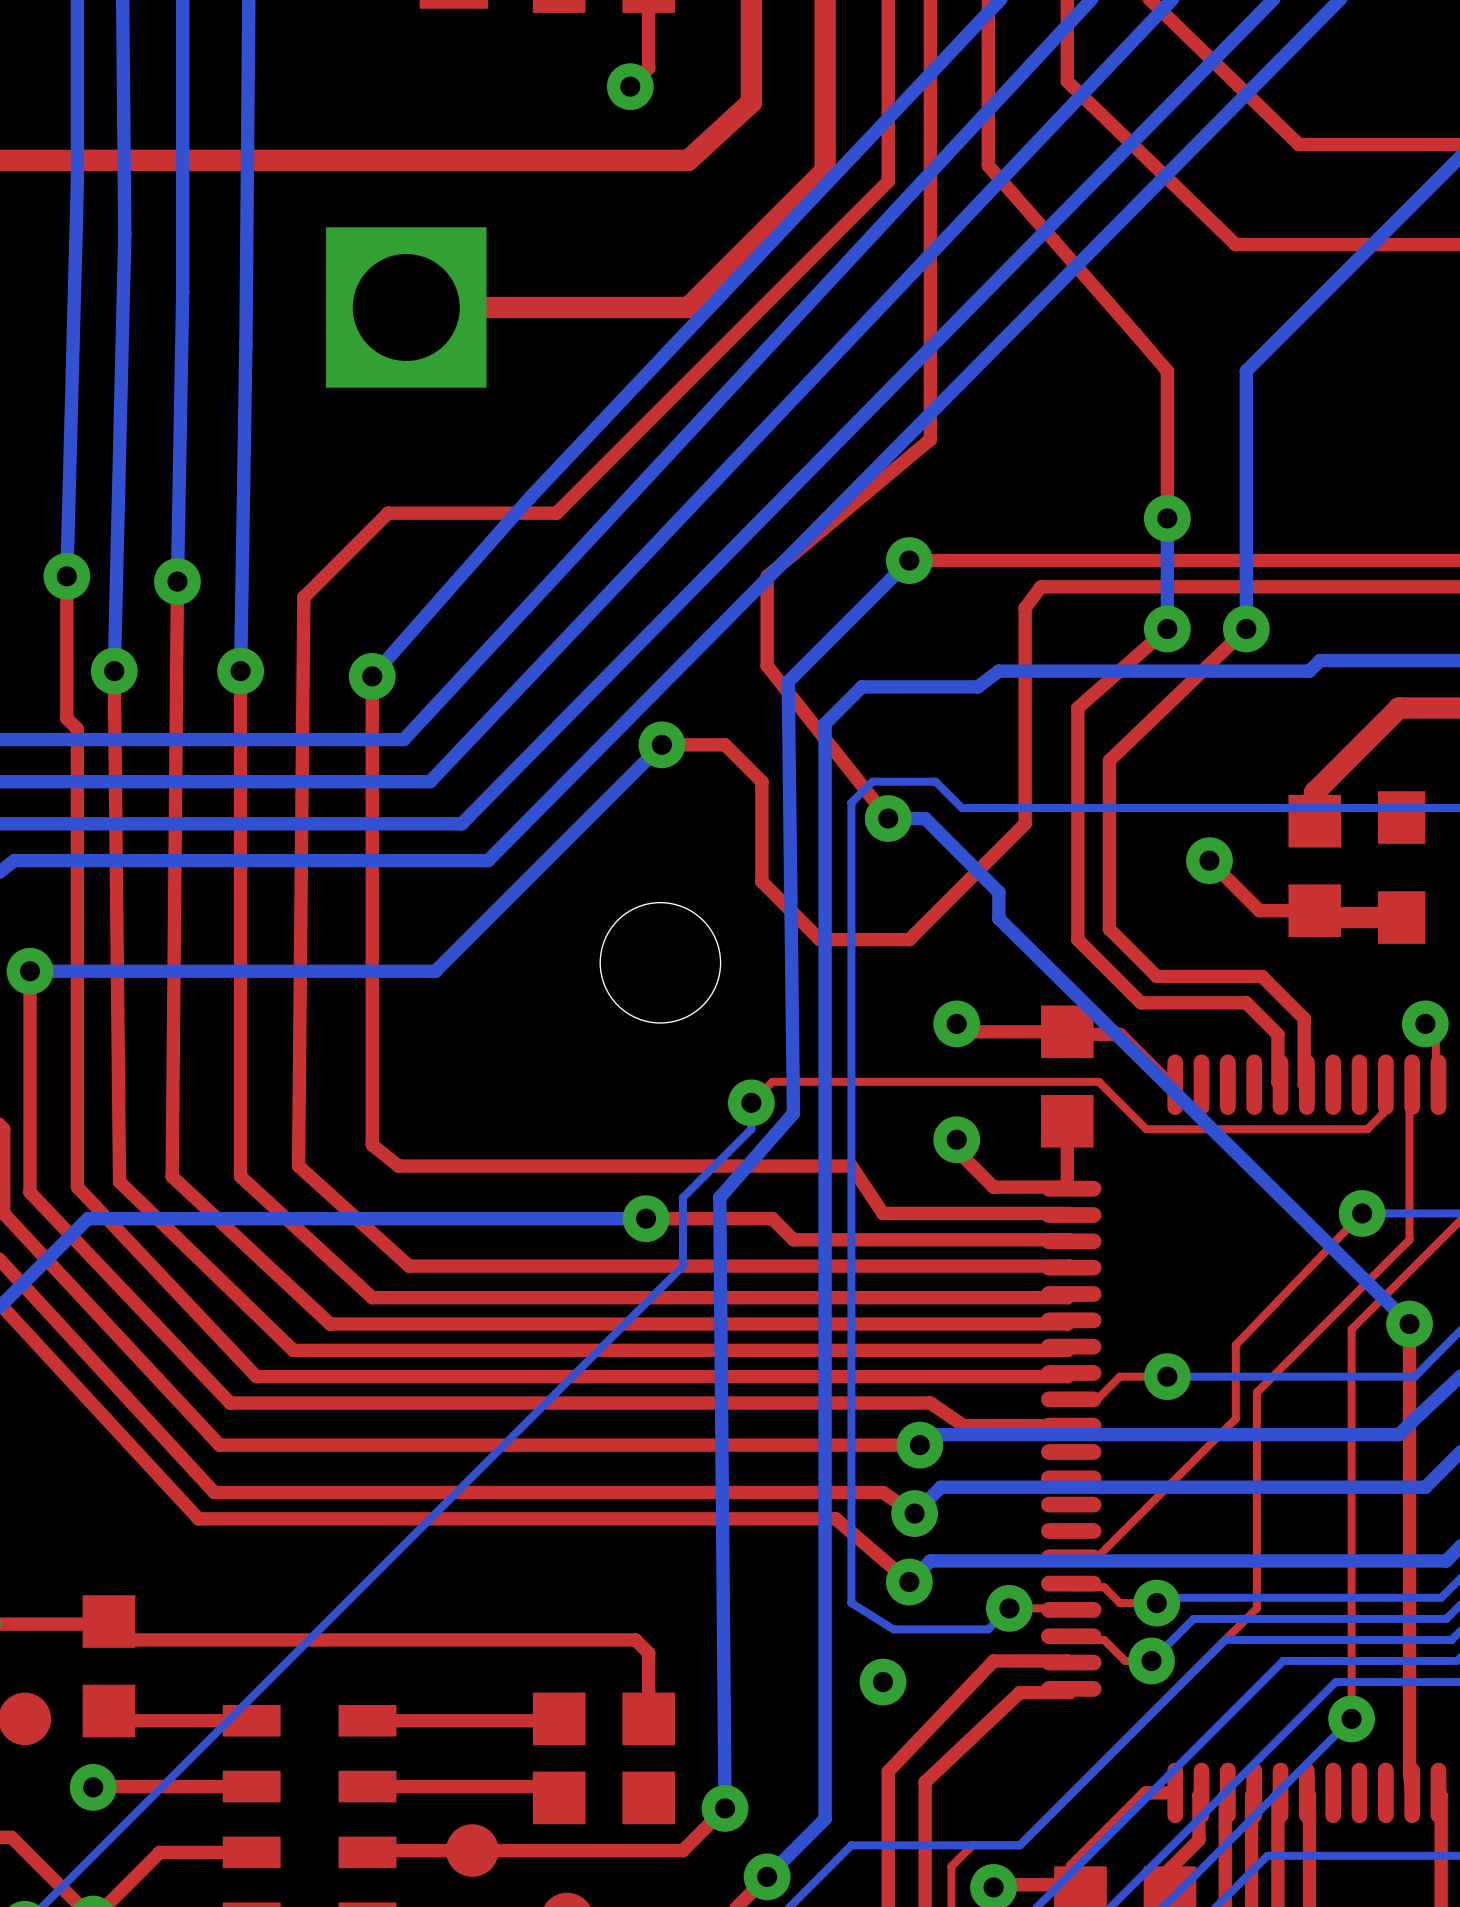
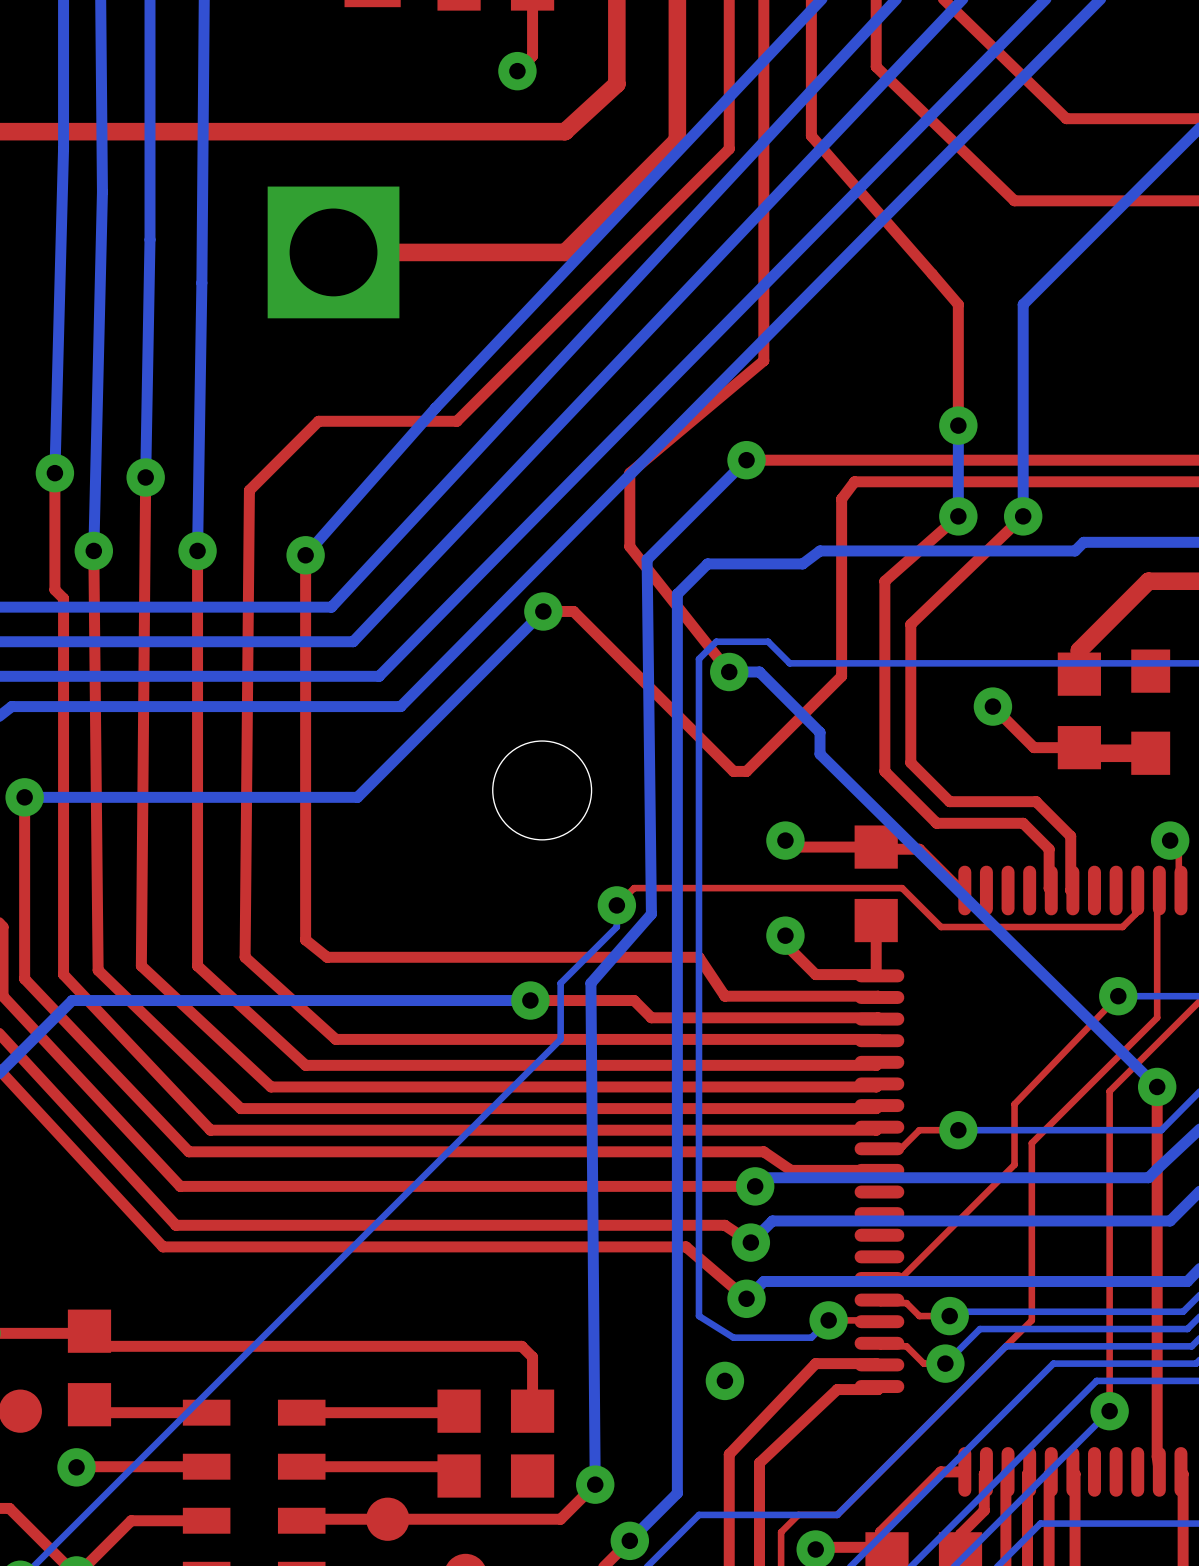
top track: (698, 744) (725, 744) (761, 781) (761, 881) (819, 939) (893, 939) -> (573, 611) (733, 771)

